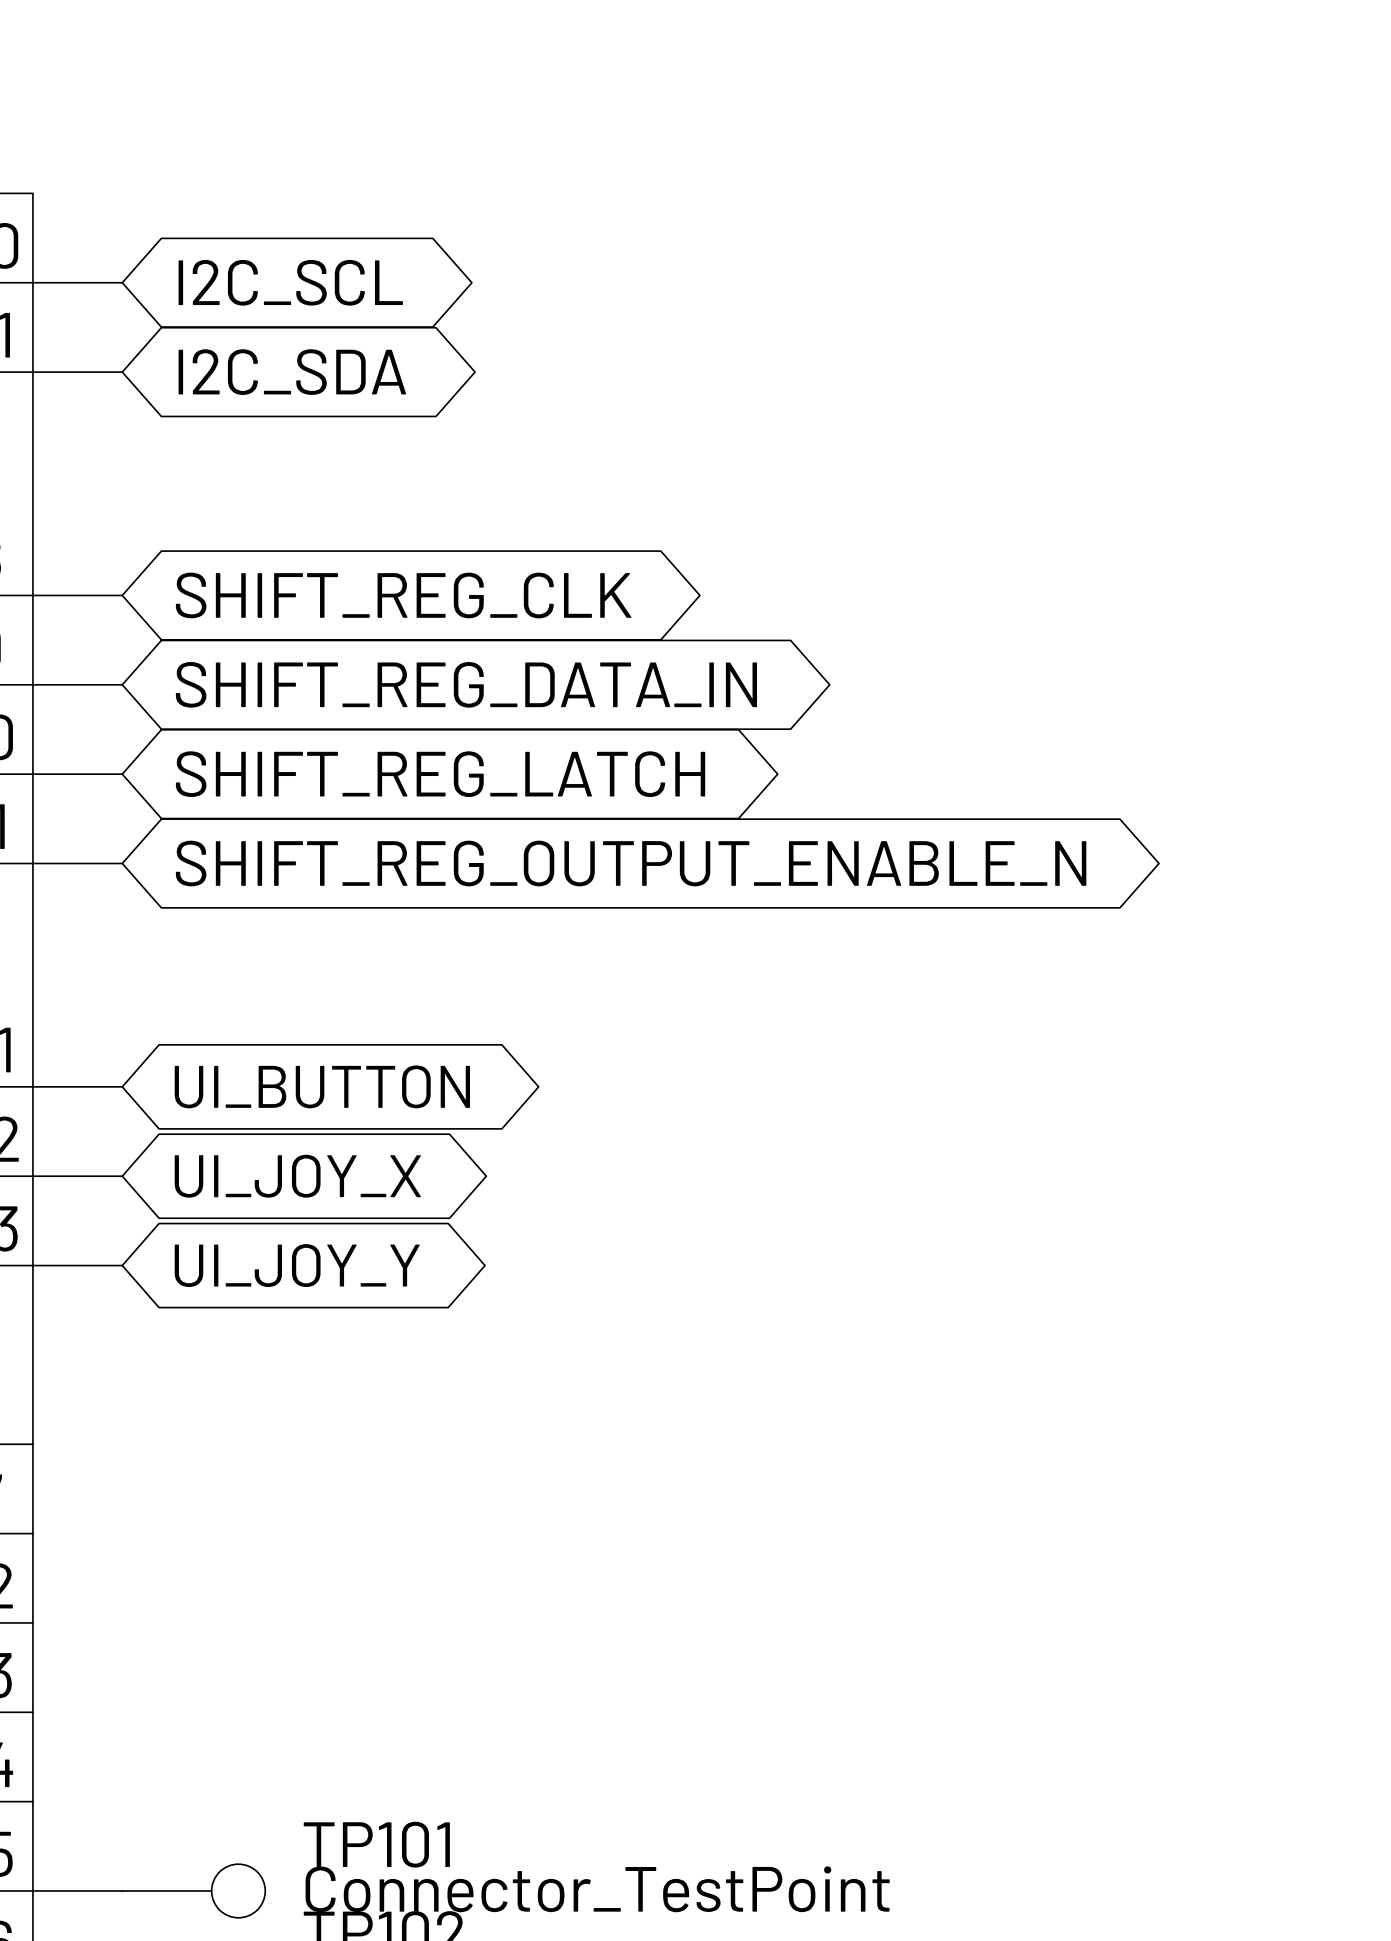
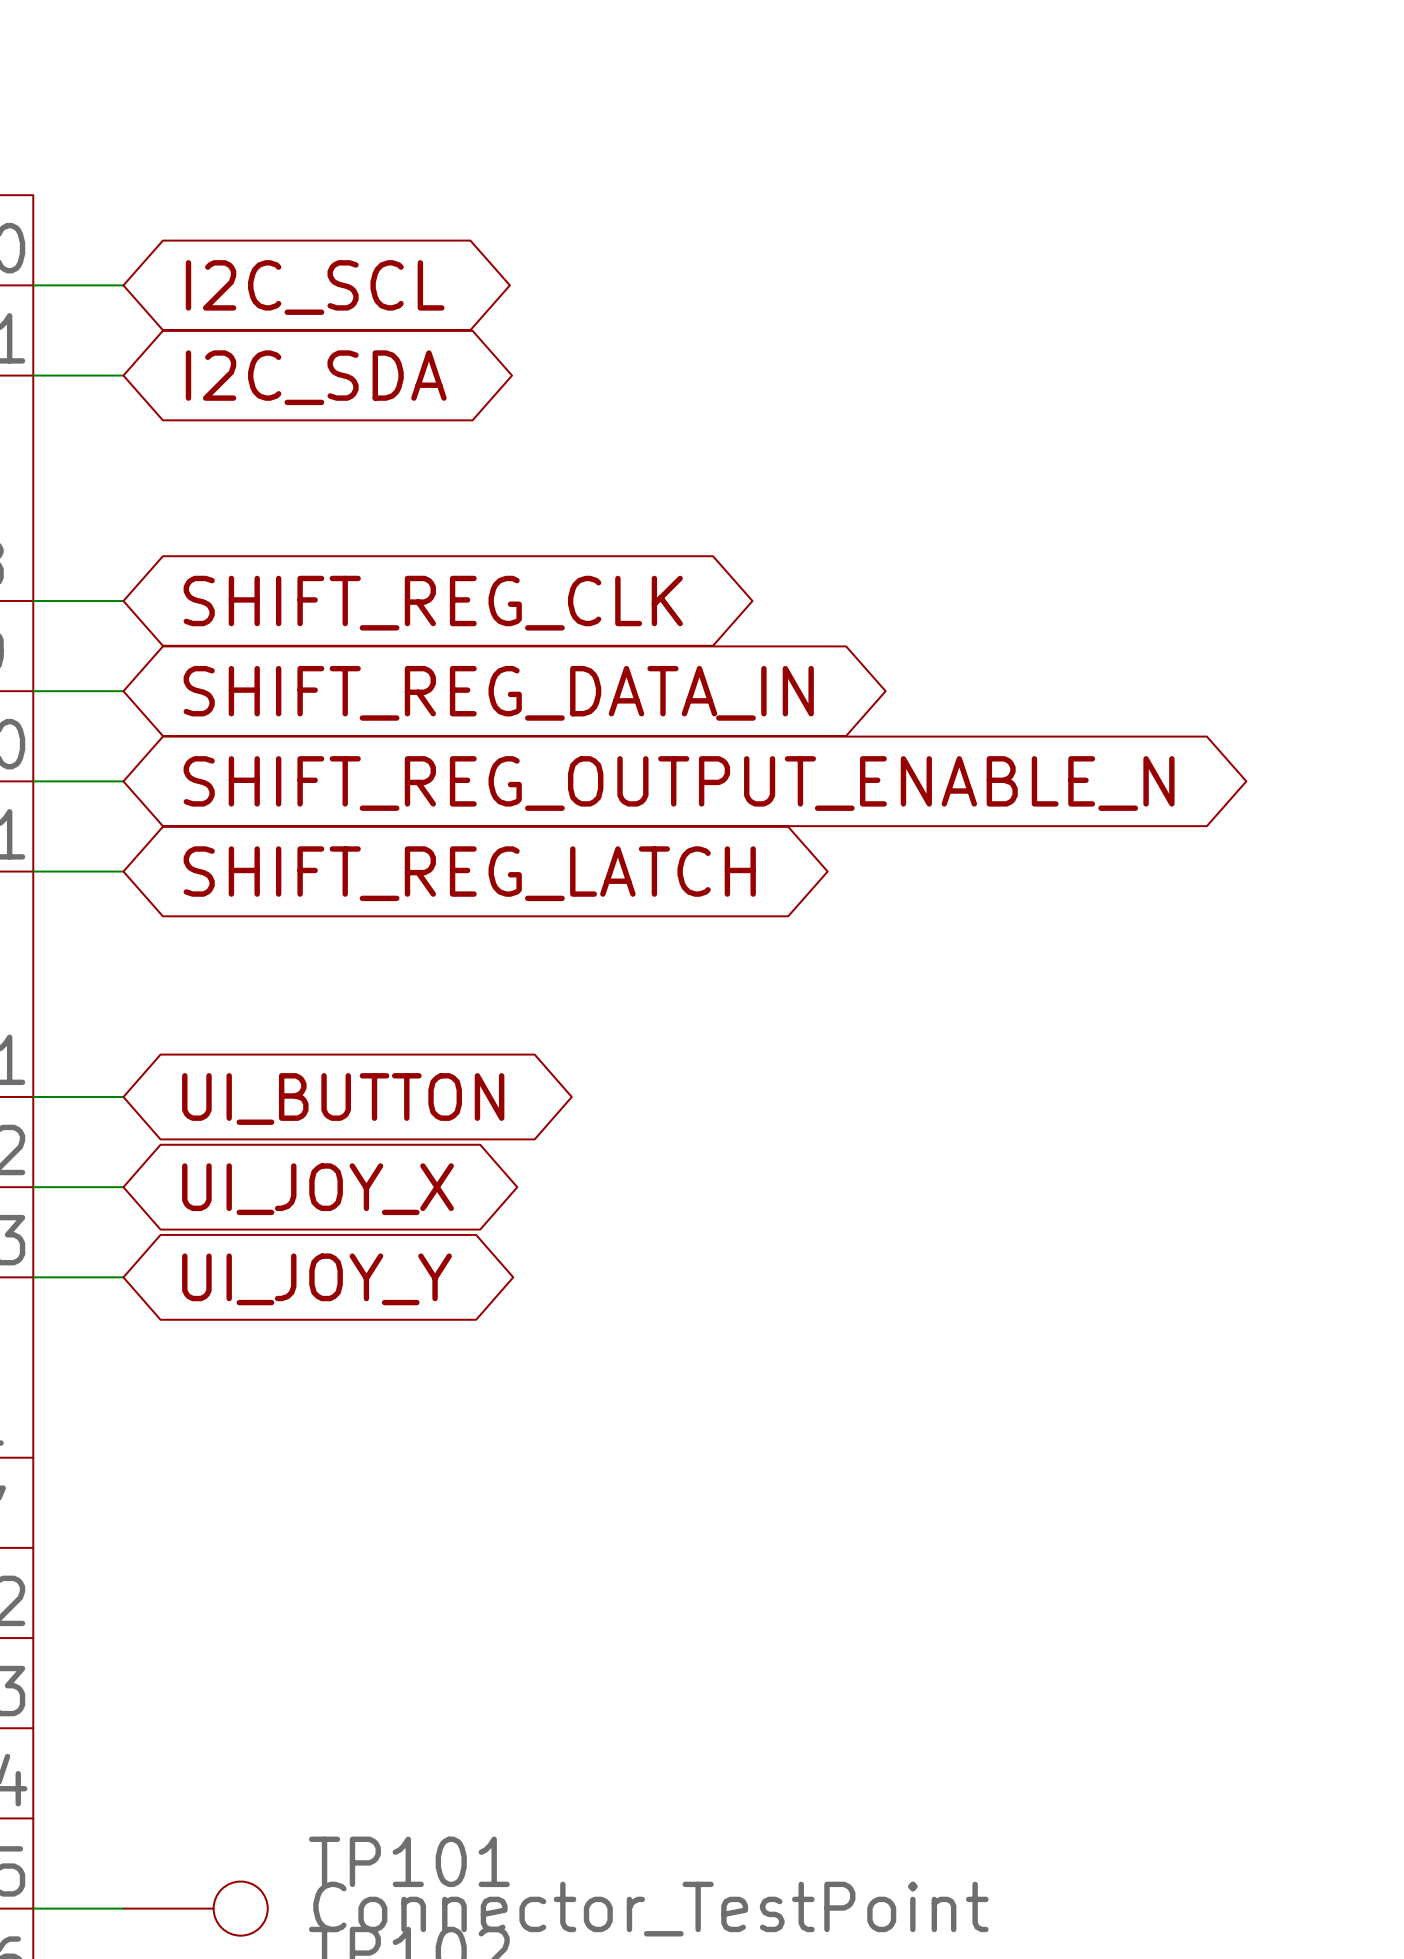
global label: SHIFT_REG_LATCH (440, 774) -> SHIFT_REG_OUTPUT_ENABLE_N (679, 783)
global label: SHIFT_REG_OUTPUT_ENABLE_N (631, 863) -> SHIFT_REG_LATCH (469, 873)

